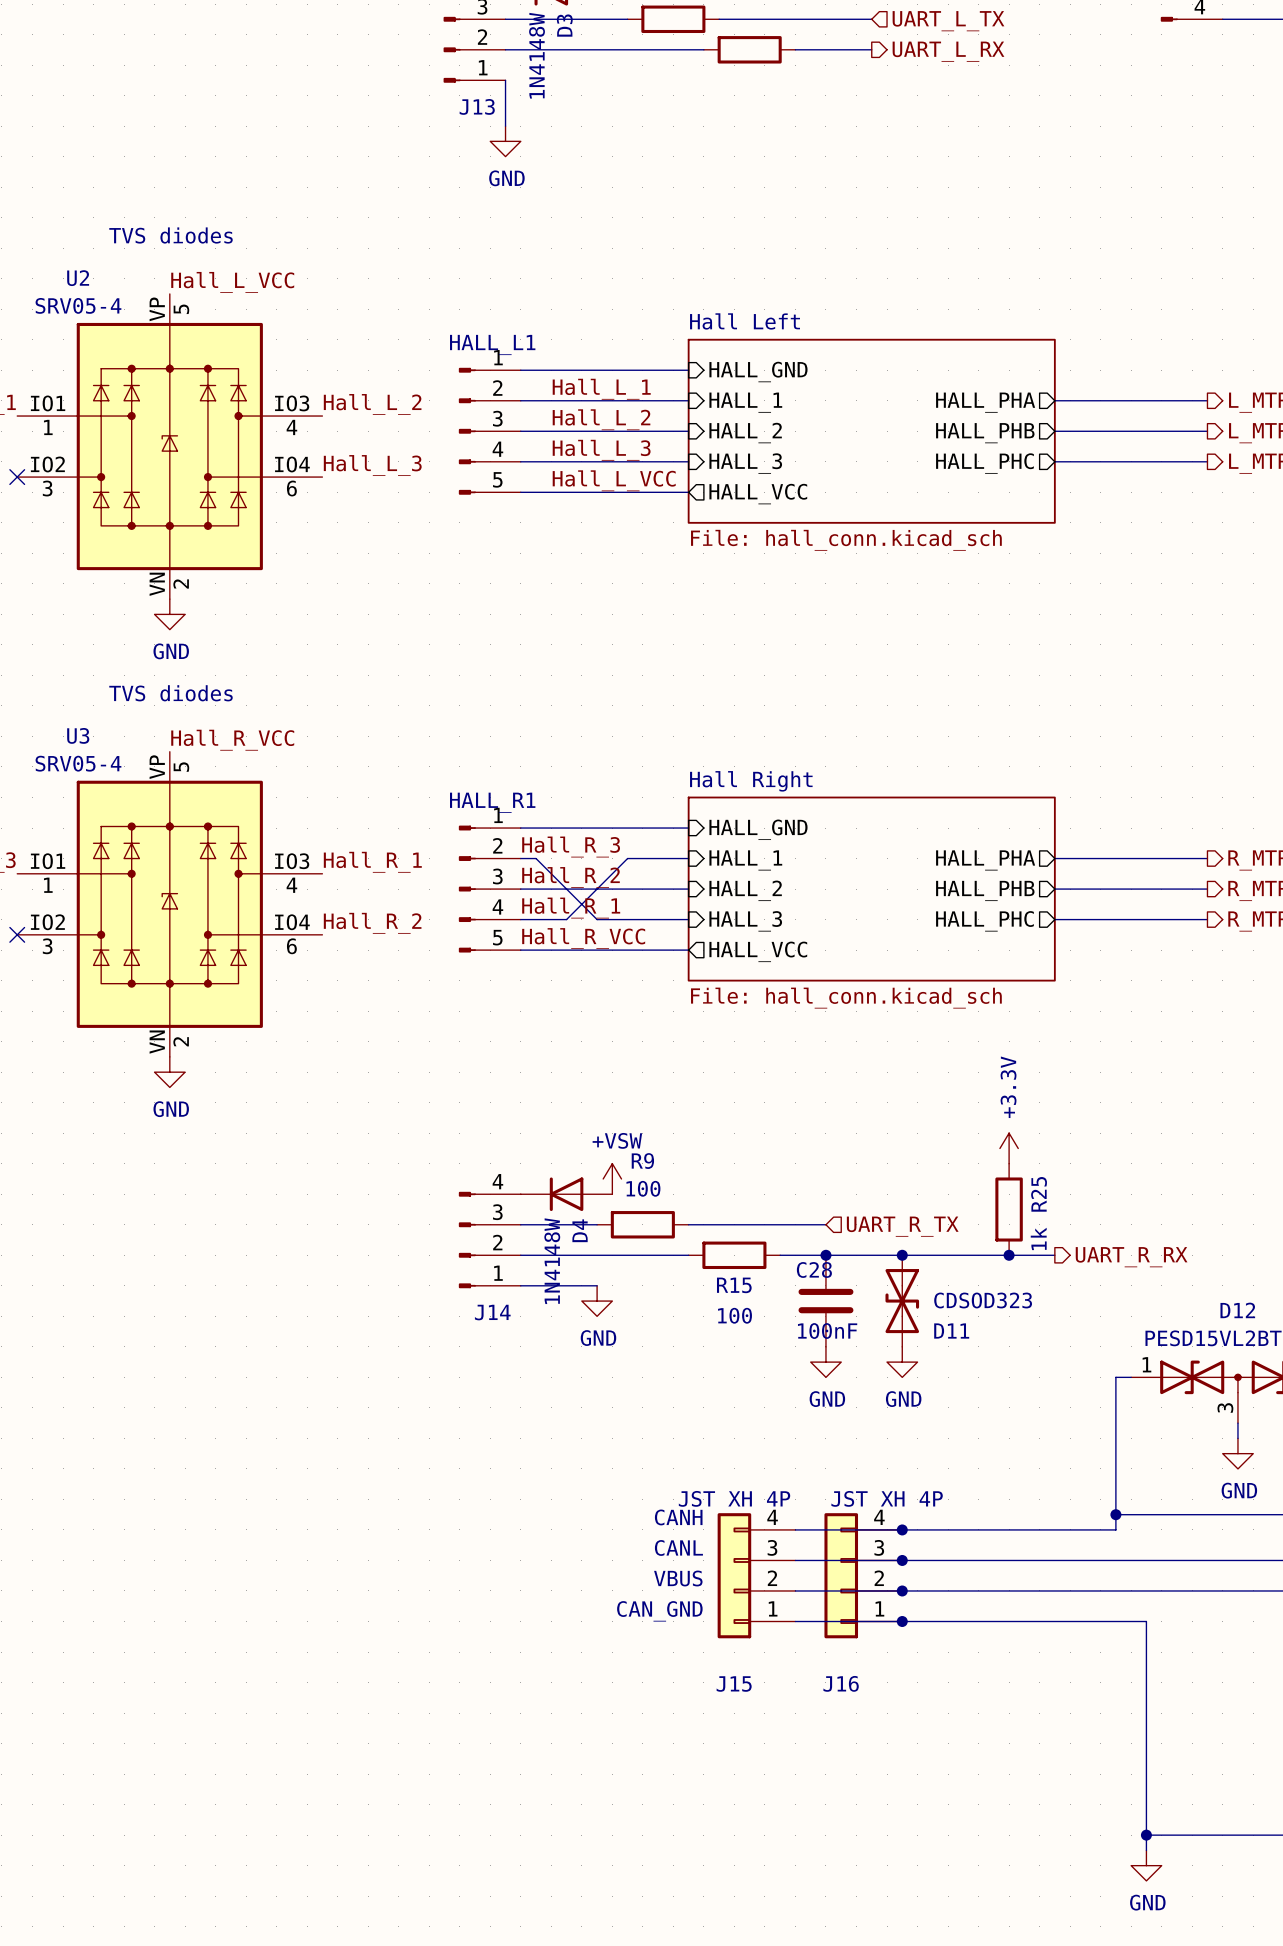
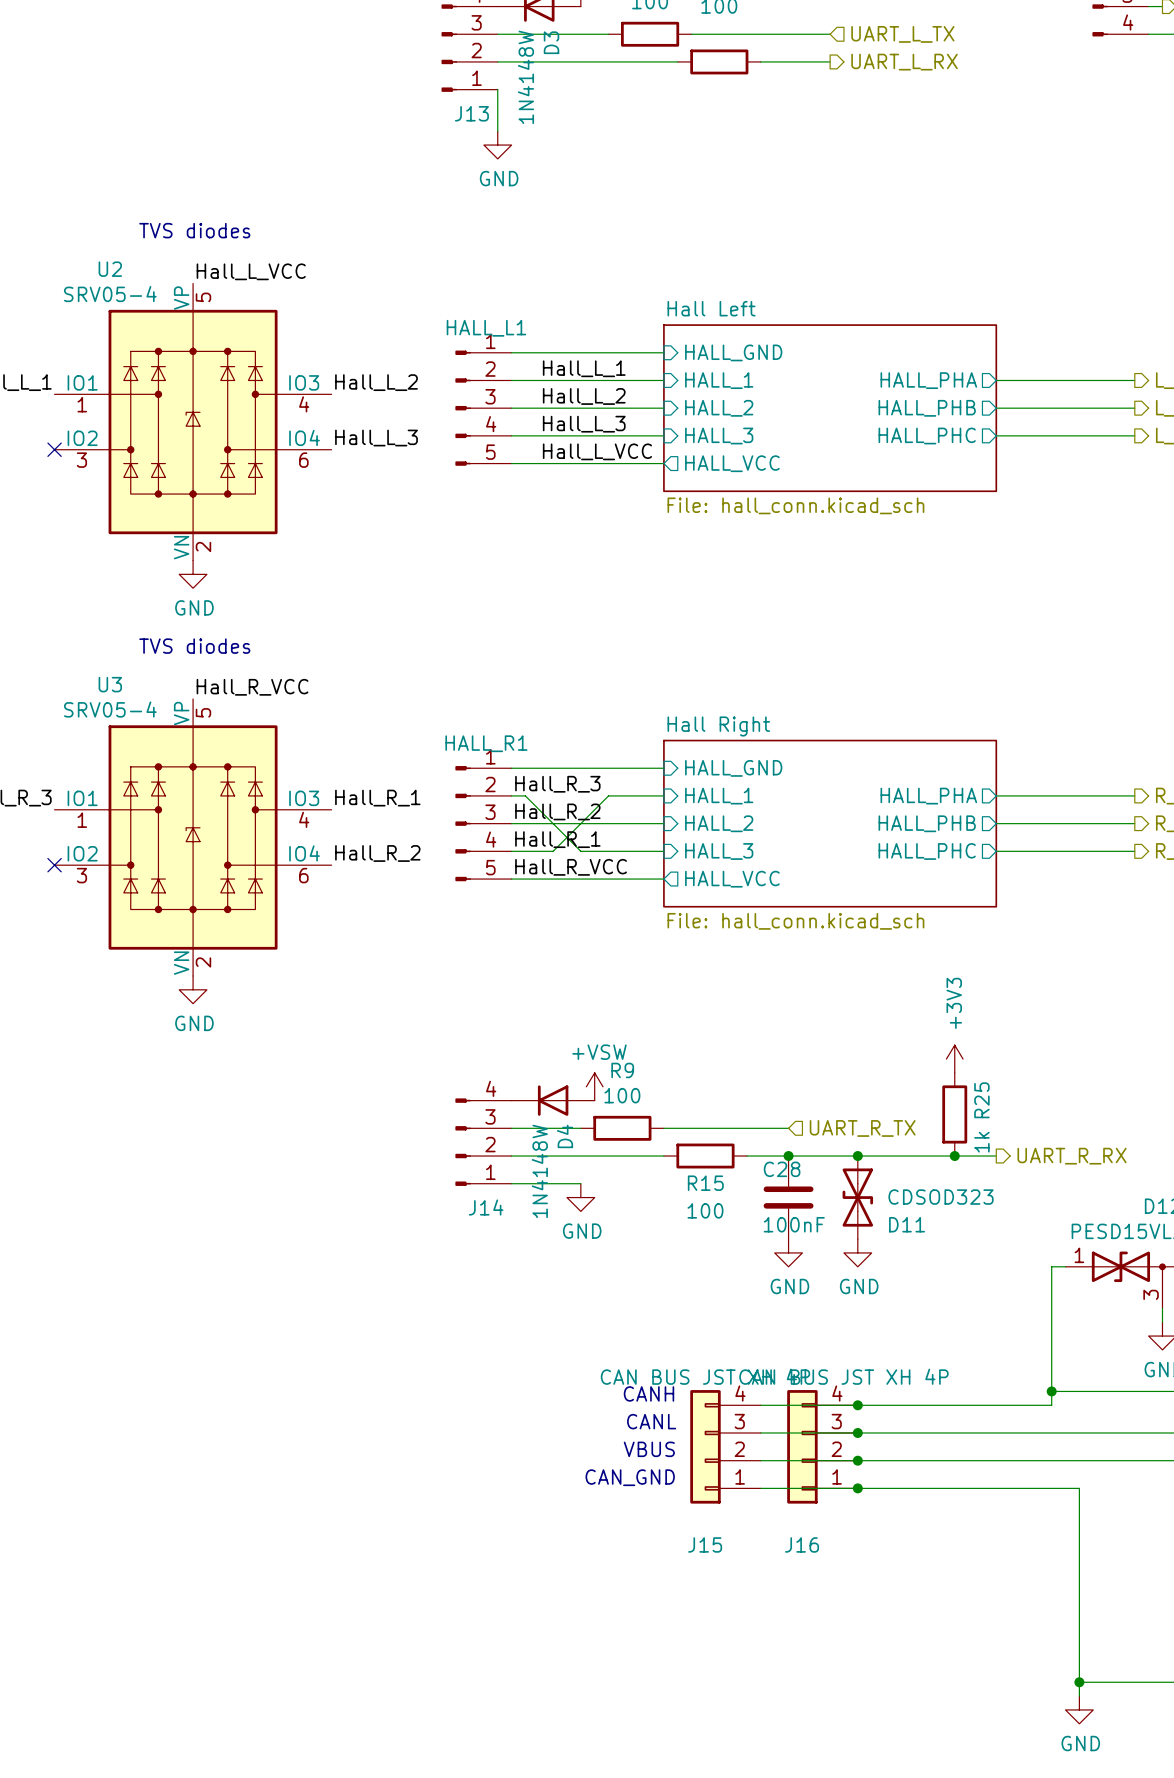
power symbol: +3.3V (1009, 1148) -> +3V3 (954, 1059)
J15 value: JST XH 4P (734, 1498) -> CAN BUS JST XH 4P (705, 1376)
J16 value: JST XH 4P (887, 1498) -> CAN BUS JST XH 4P (843, 1376)

